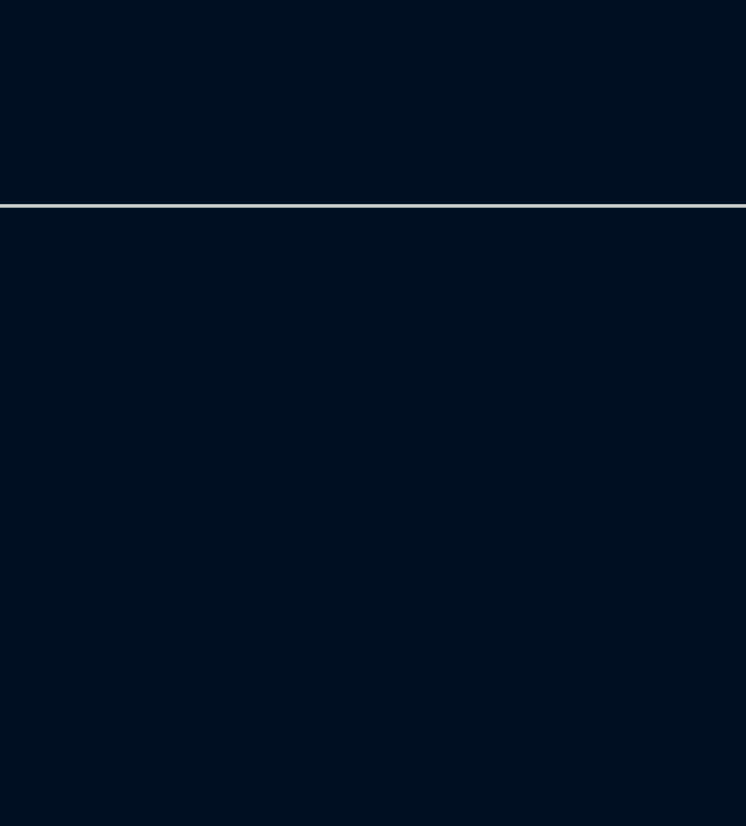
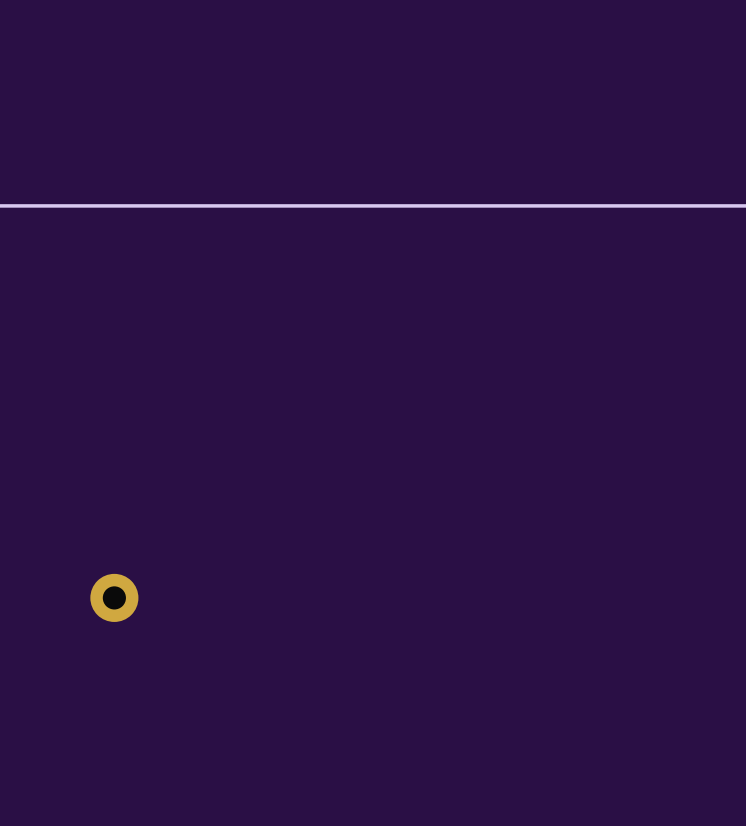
via: none -> (114, 597)

